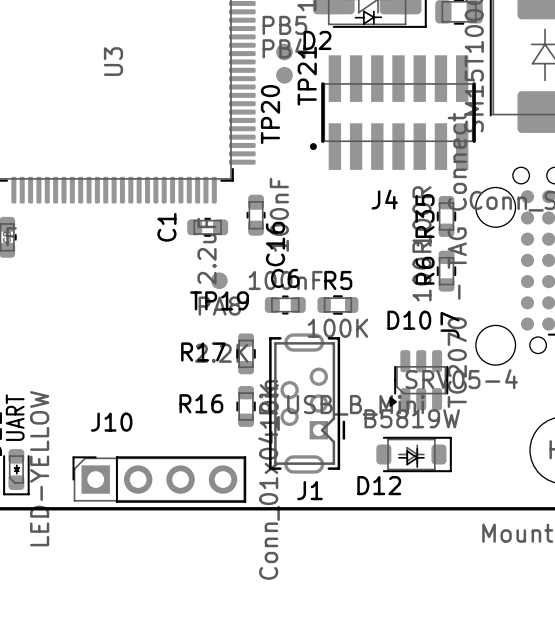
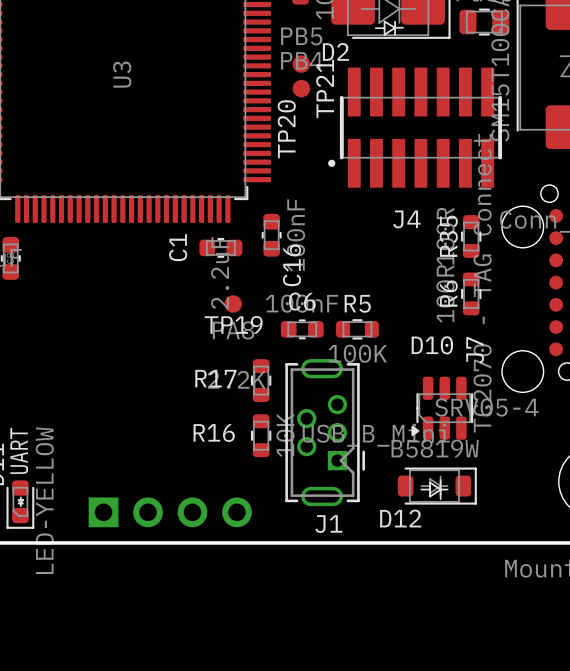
J10 side: top (159, 479) -> bottom (170, 512)

